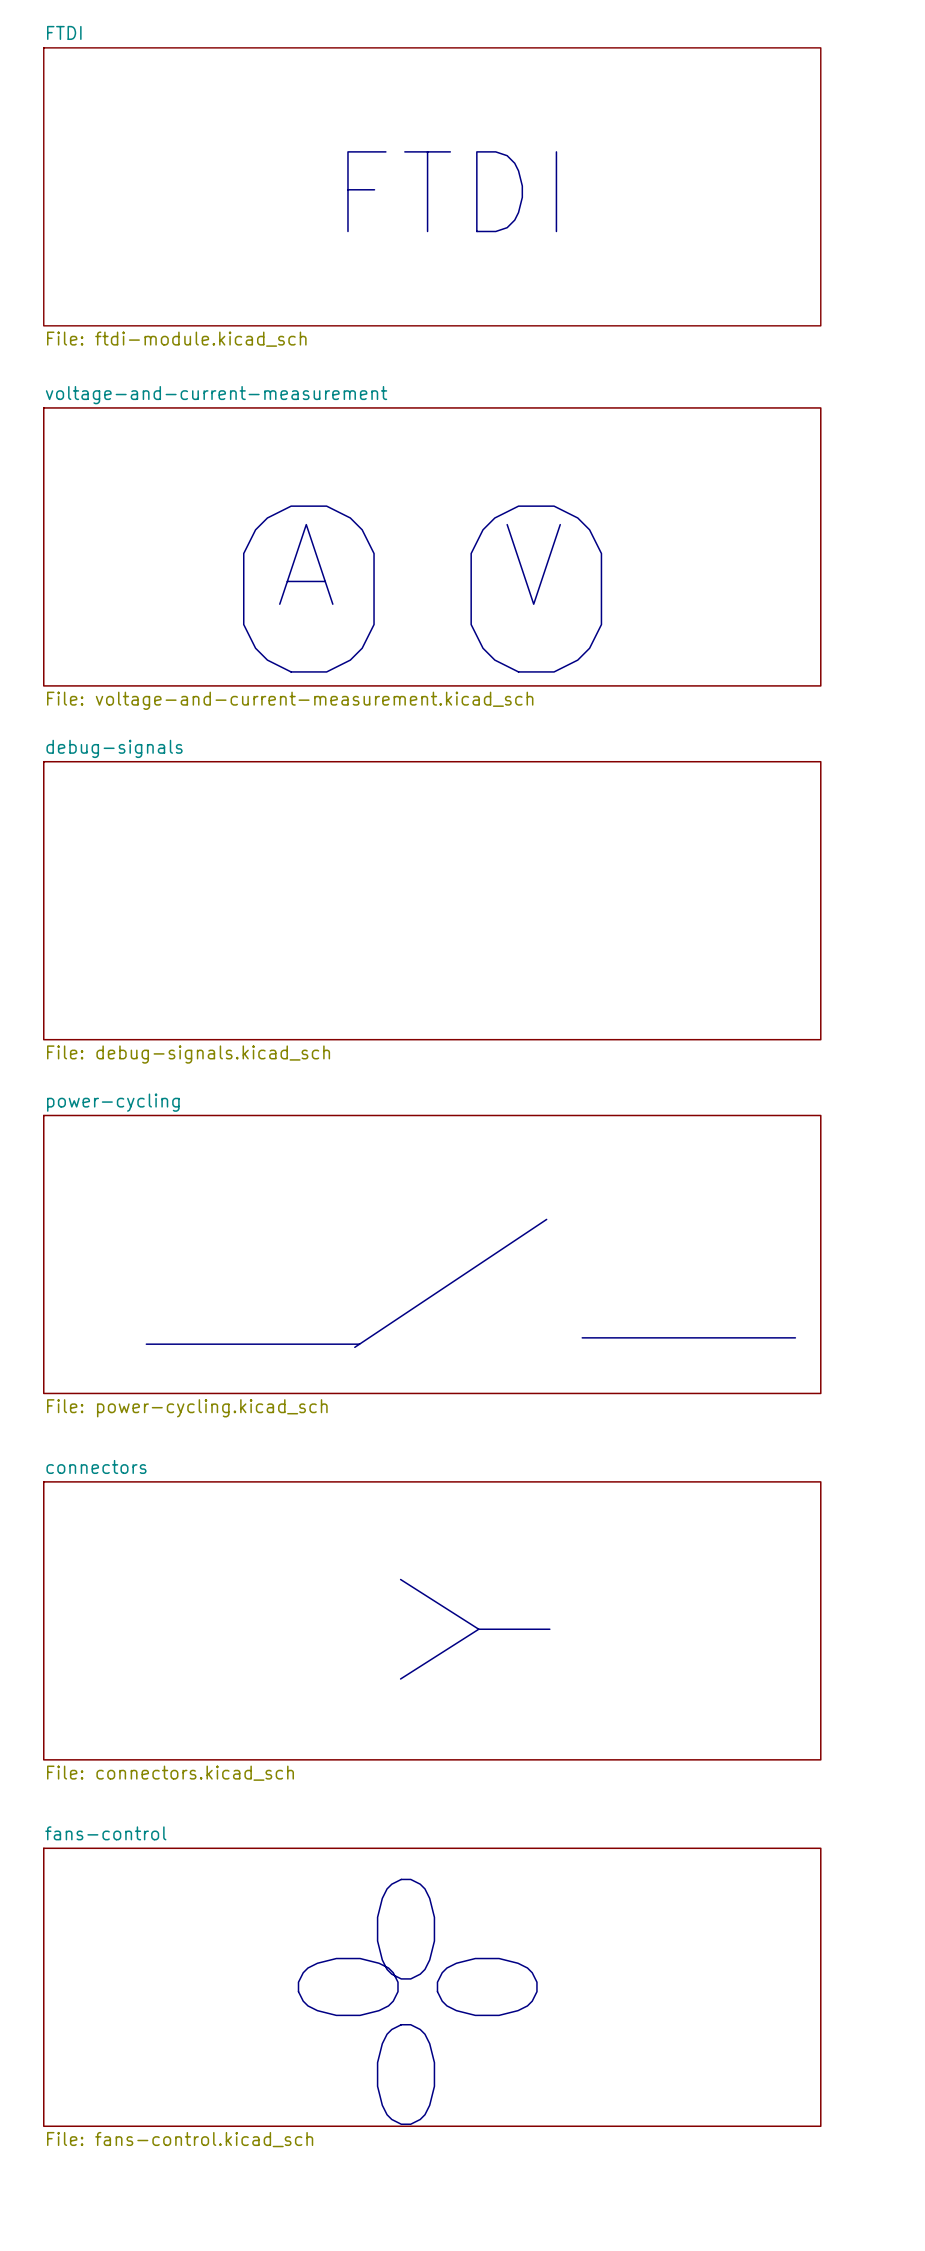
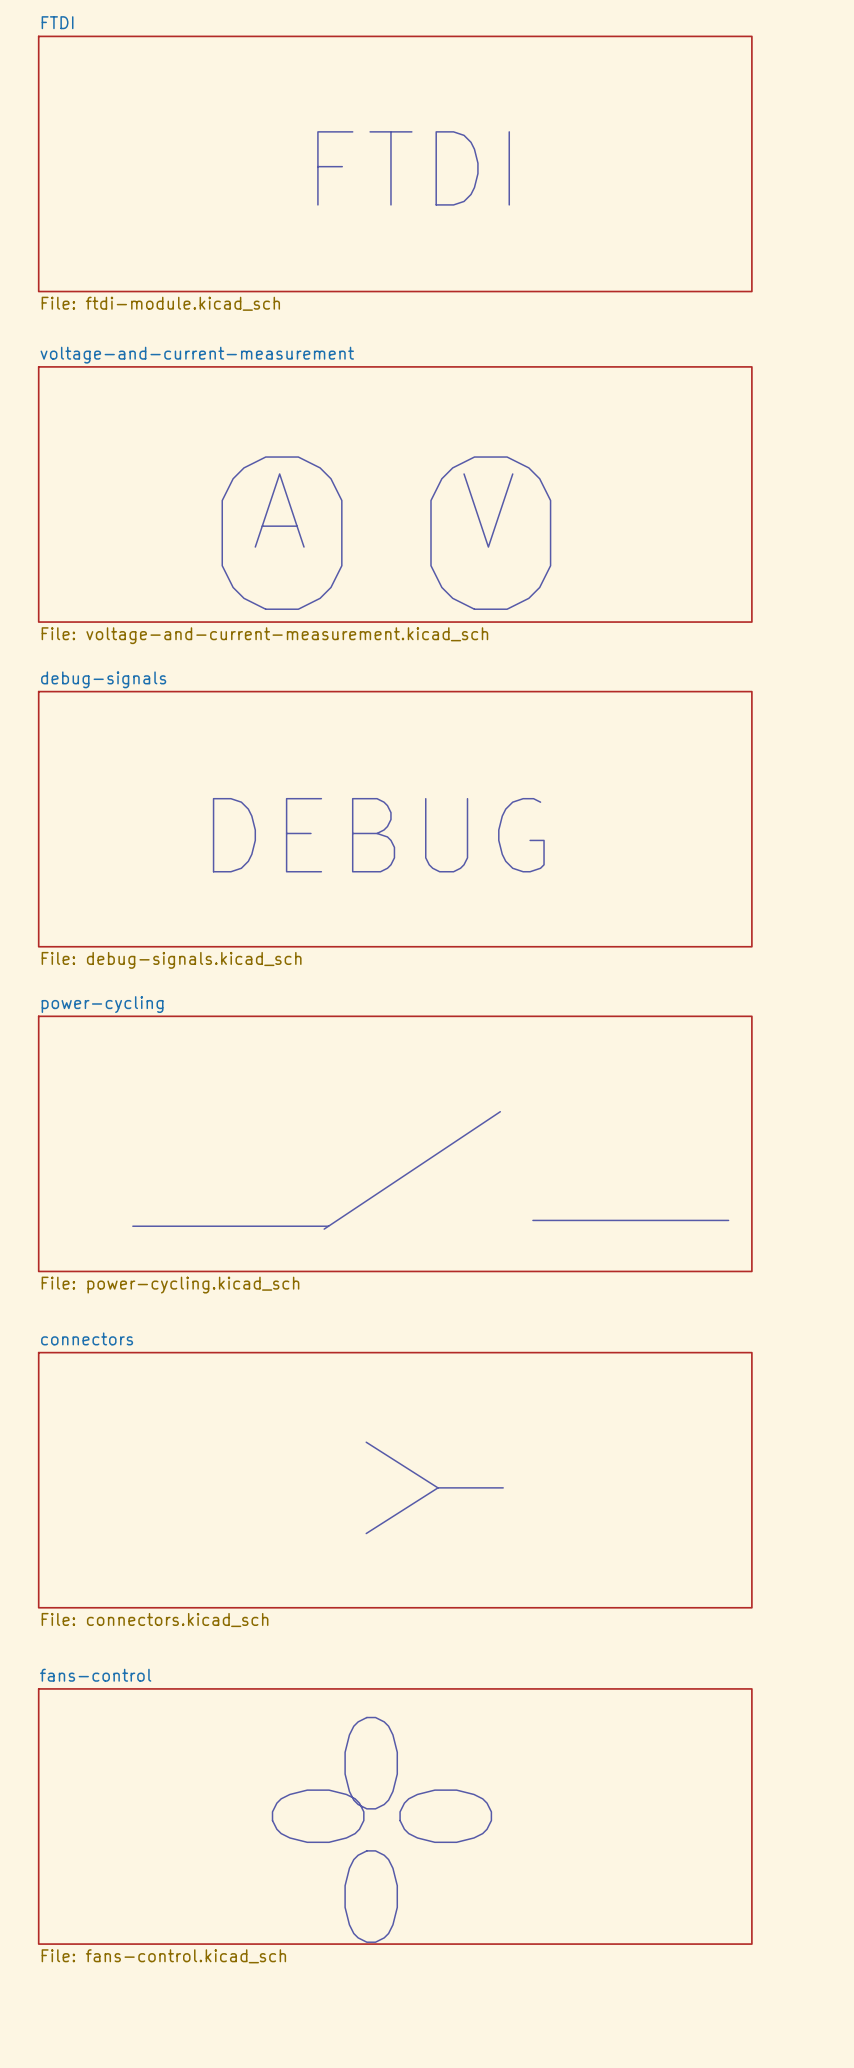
text: none -> DEBUG (378, 835)

